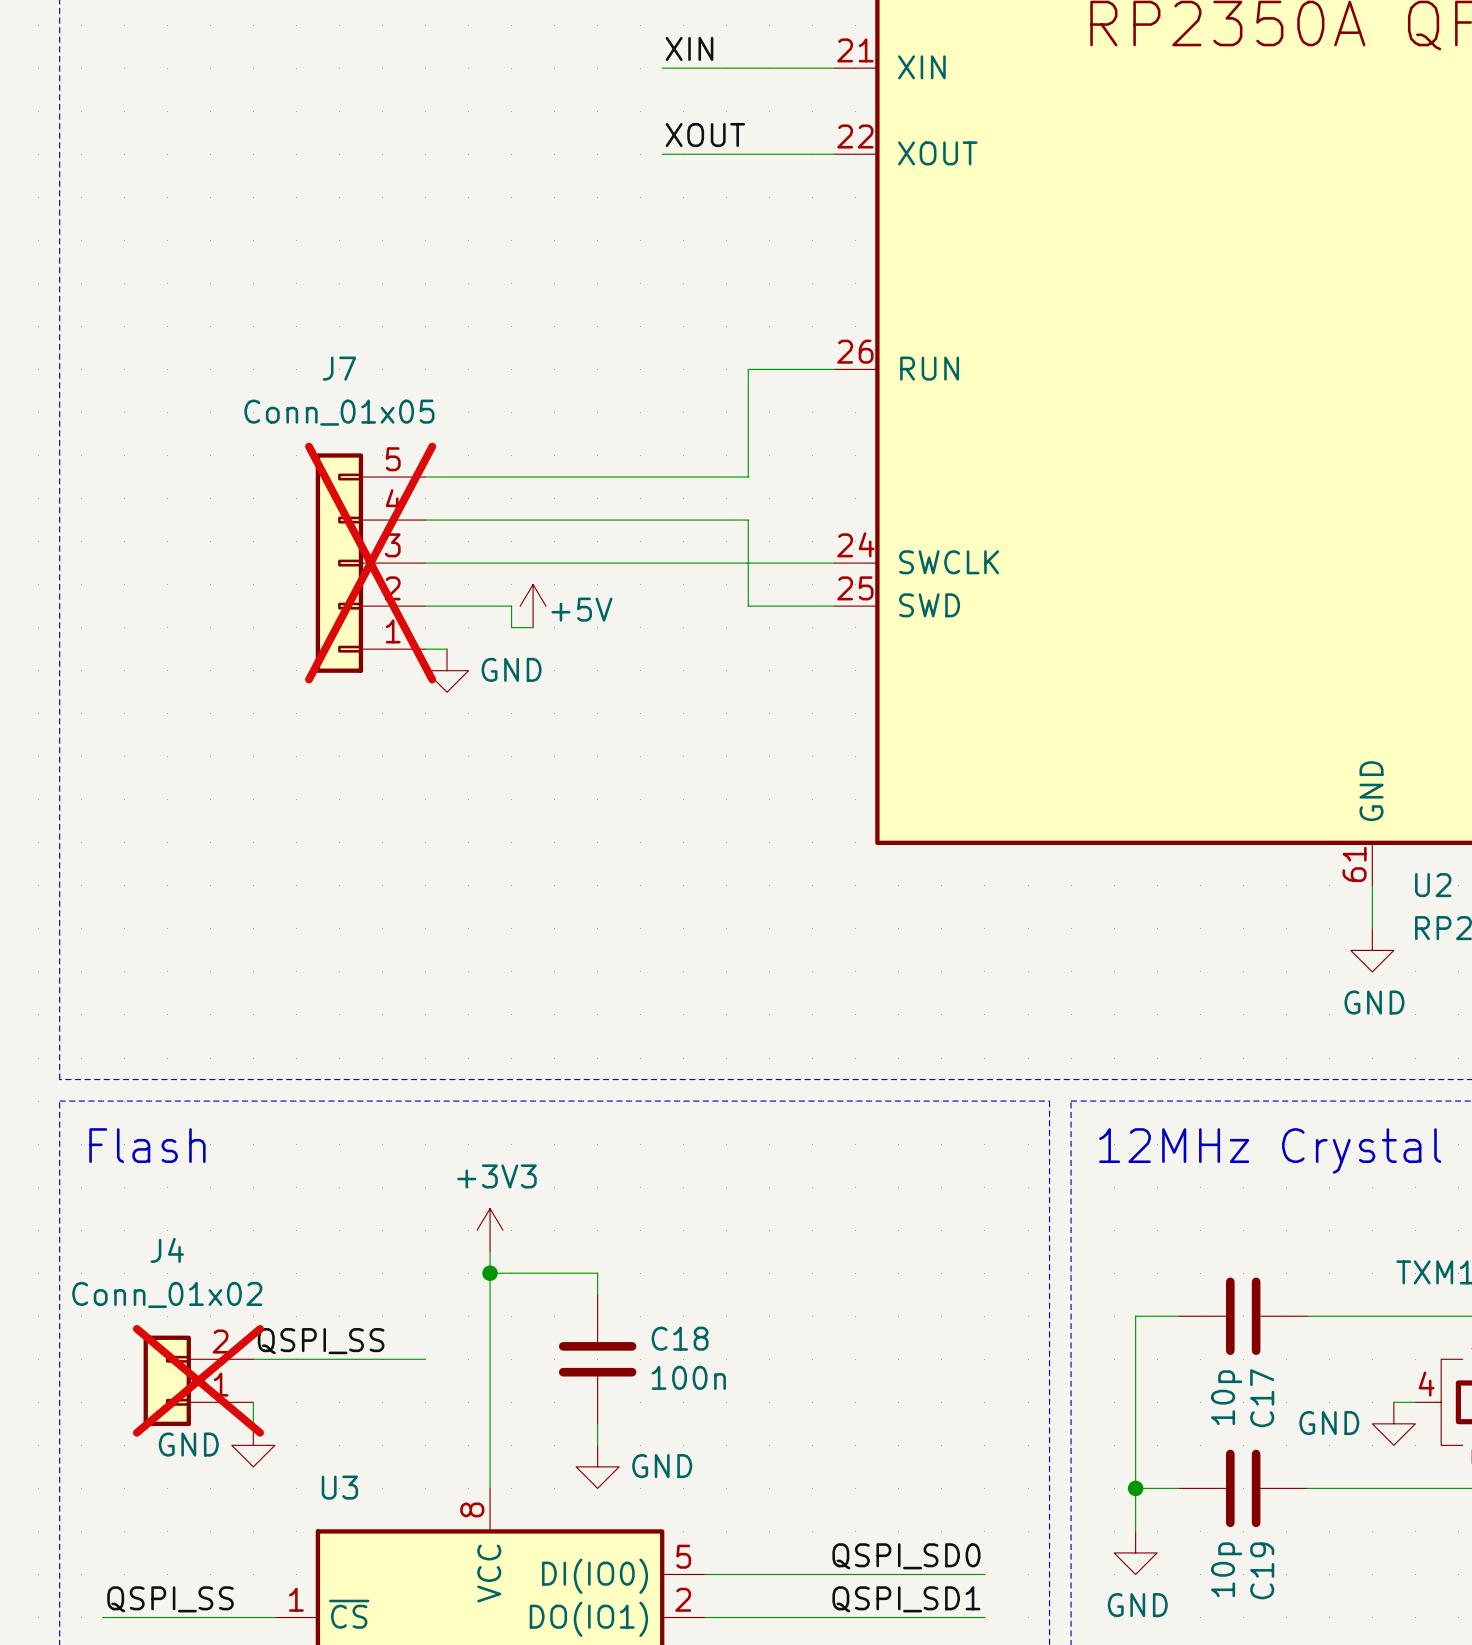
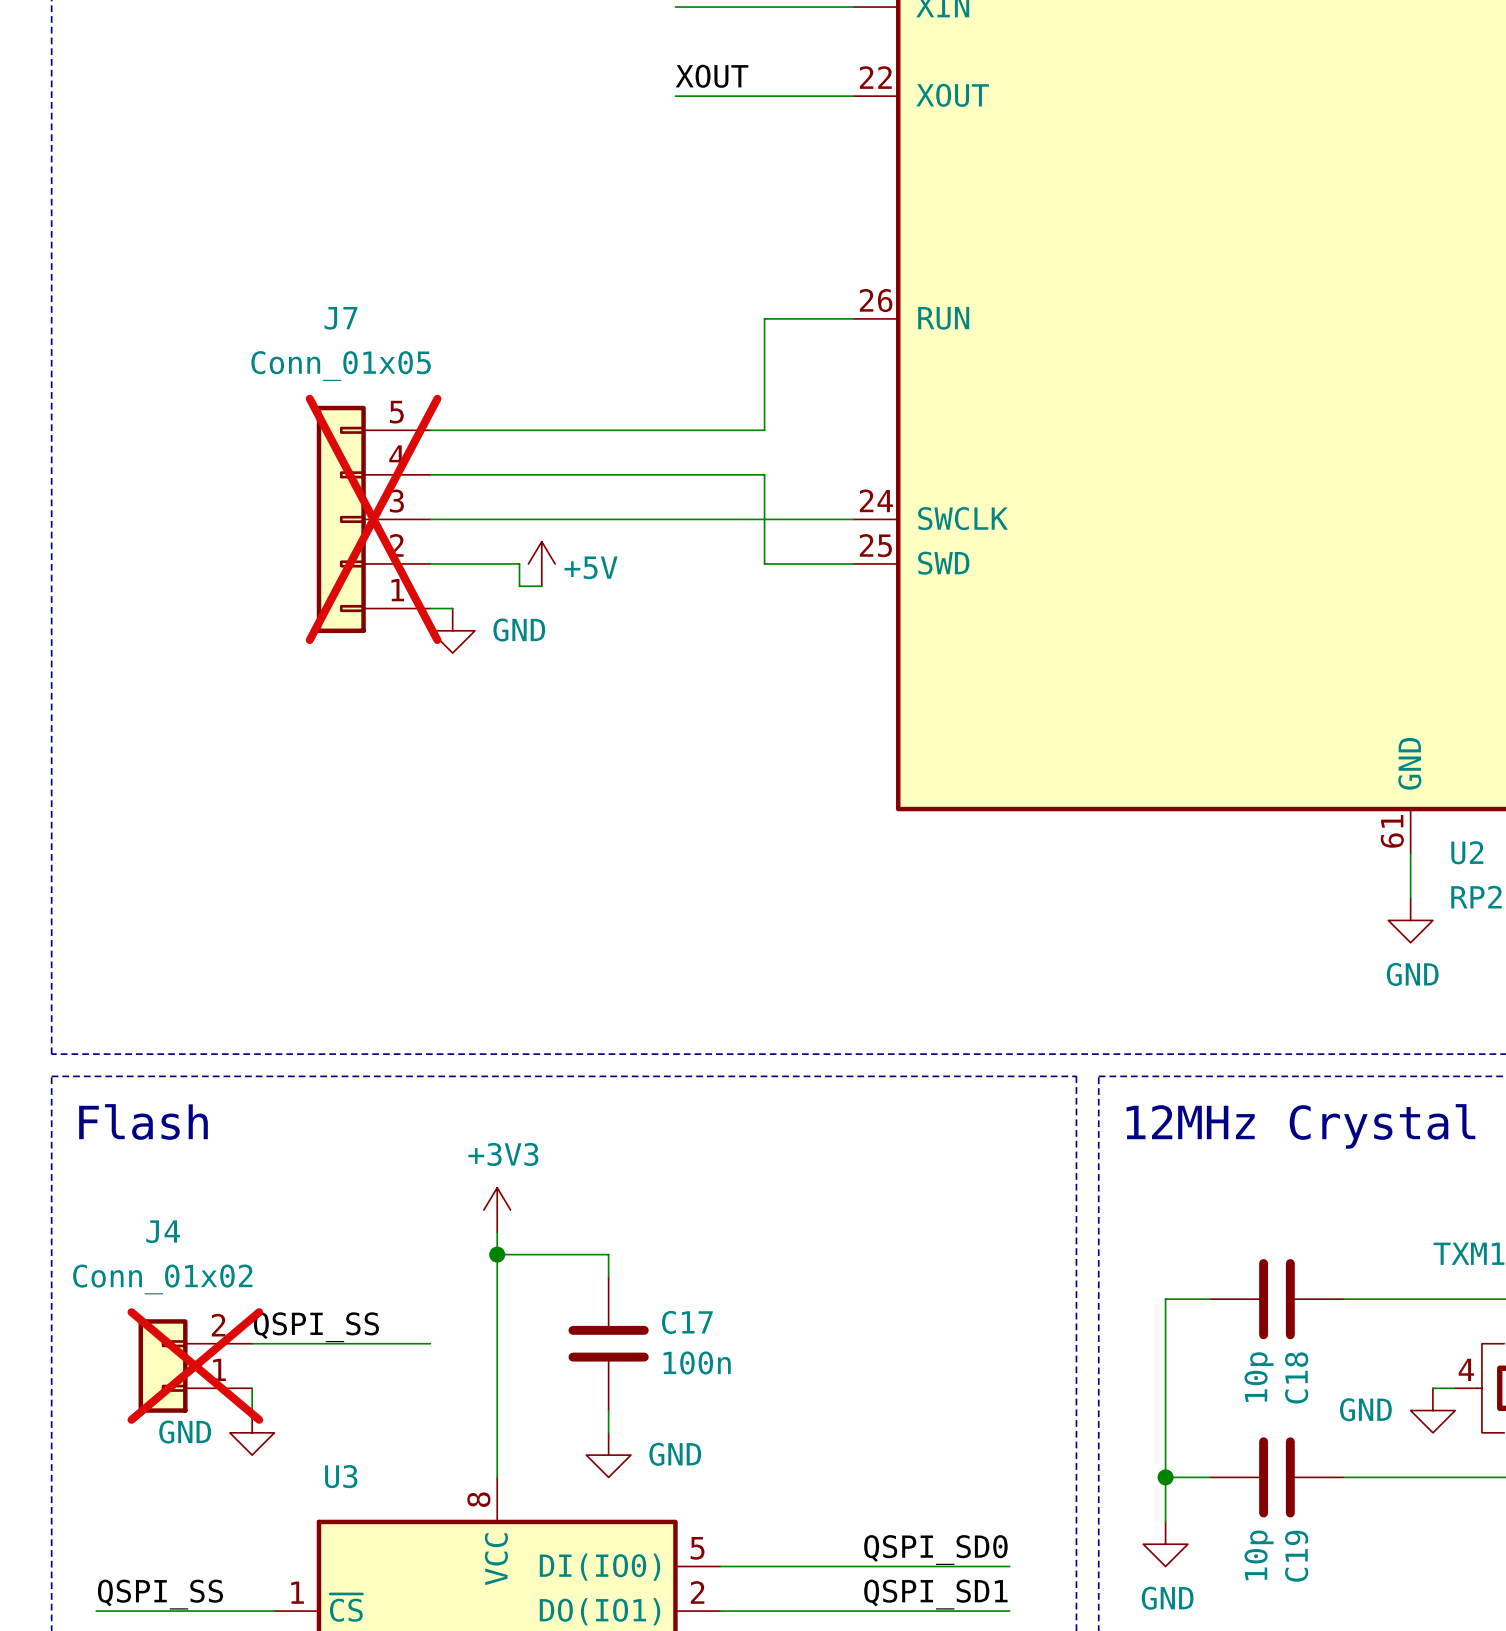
C18 name: C18 (680, 1338) -> C17 (687, 1322)
C17 name: C17 (1262, 1398) -> C18 (1296, 1377)

